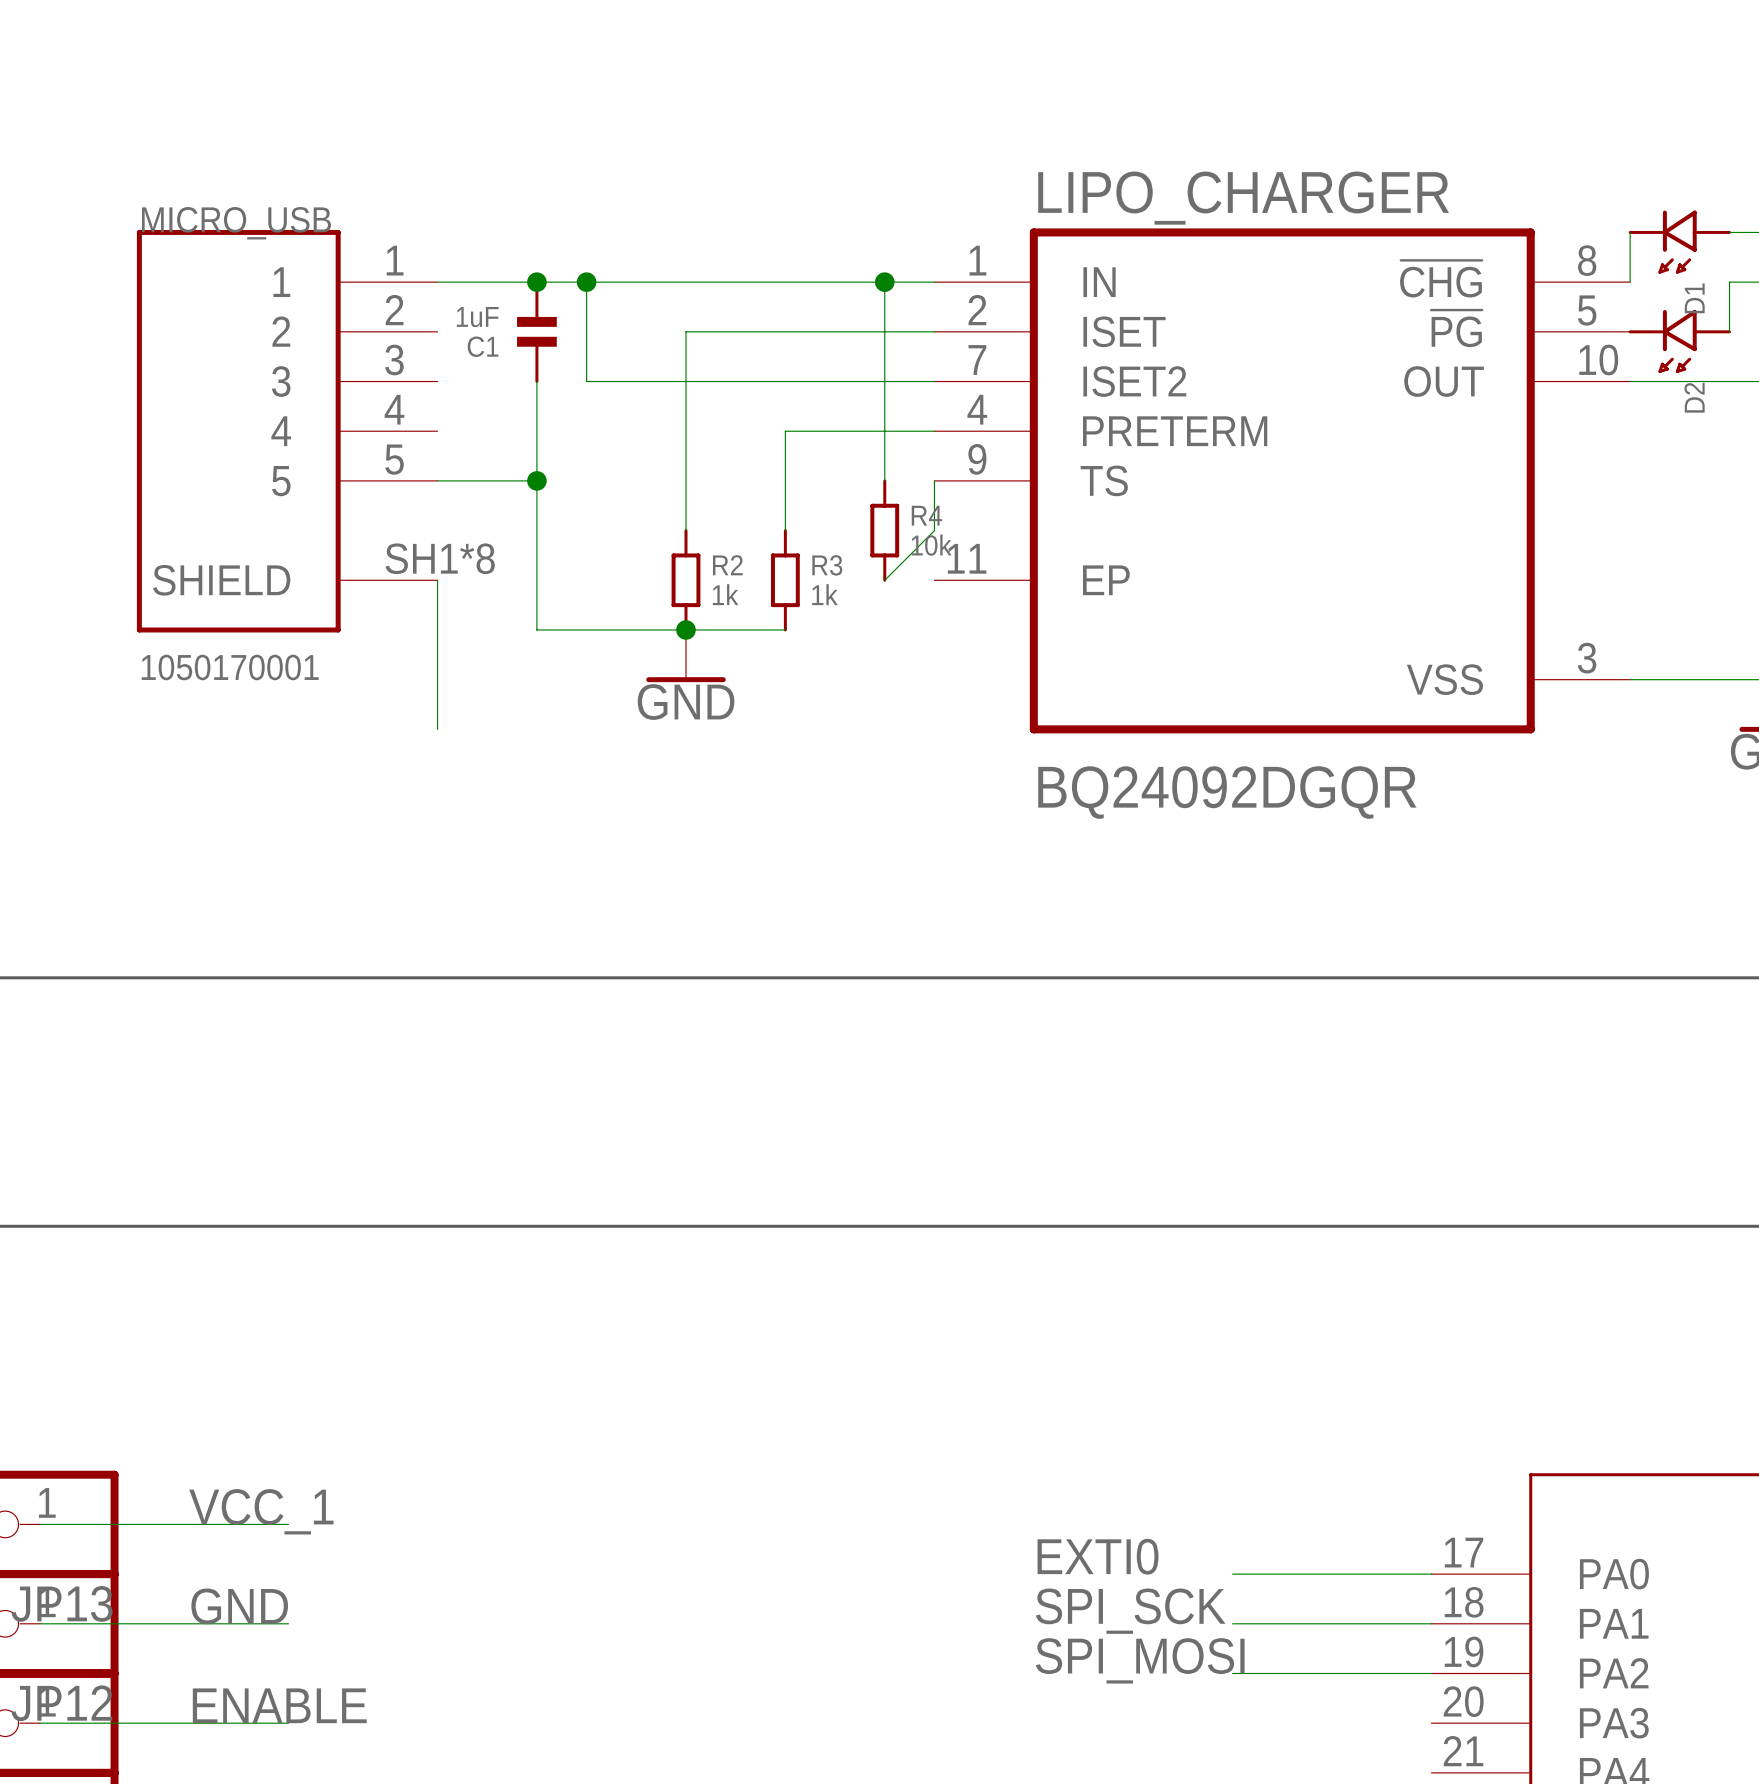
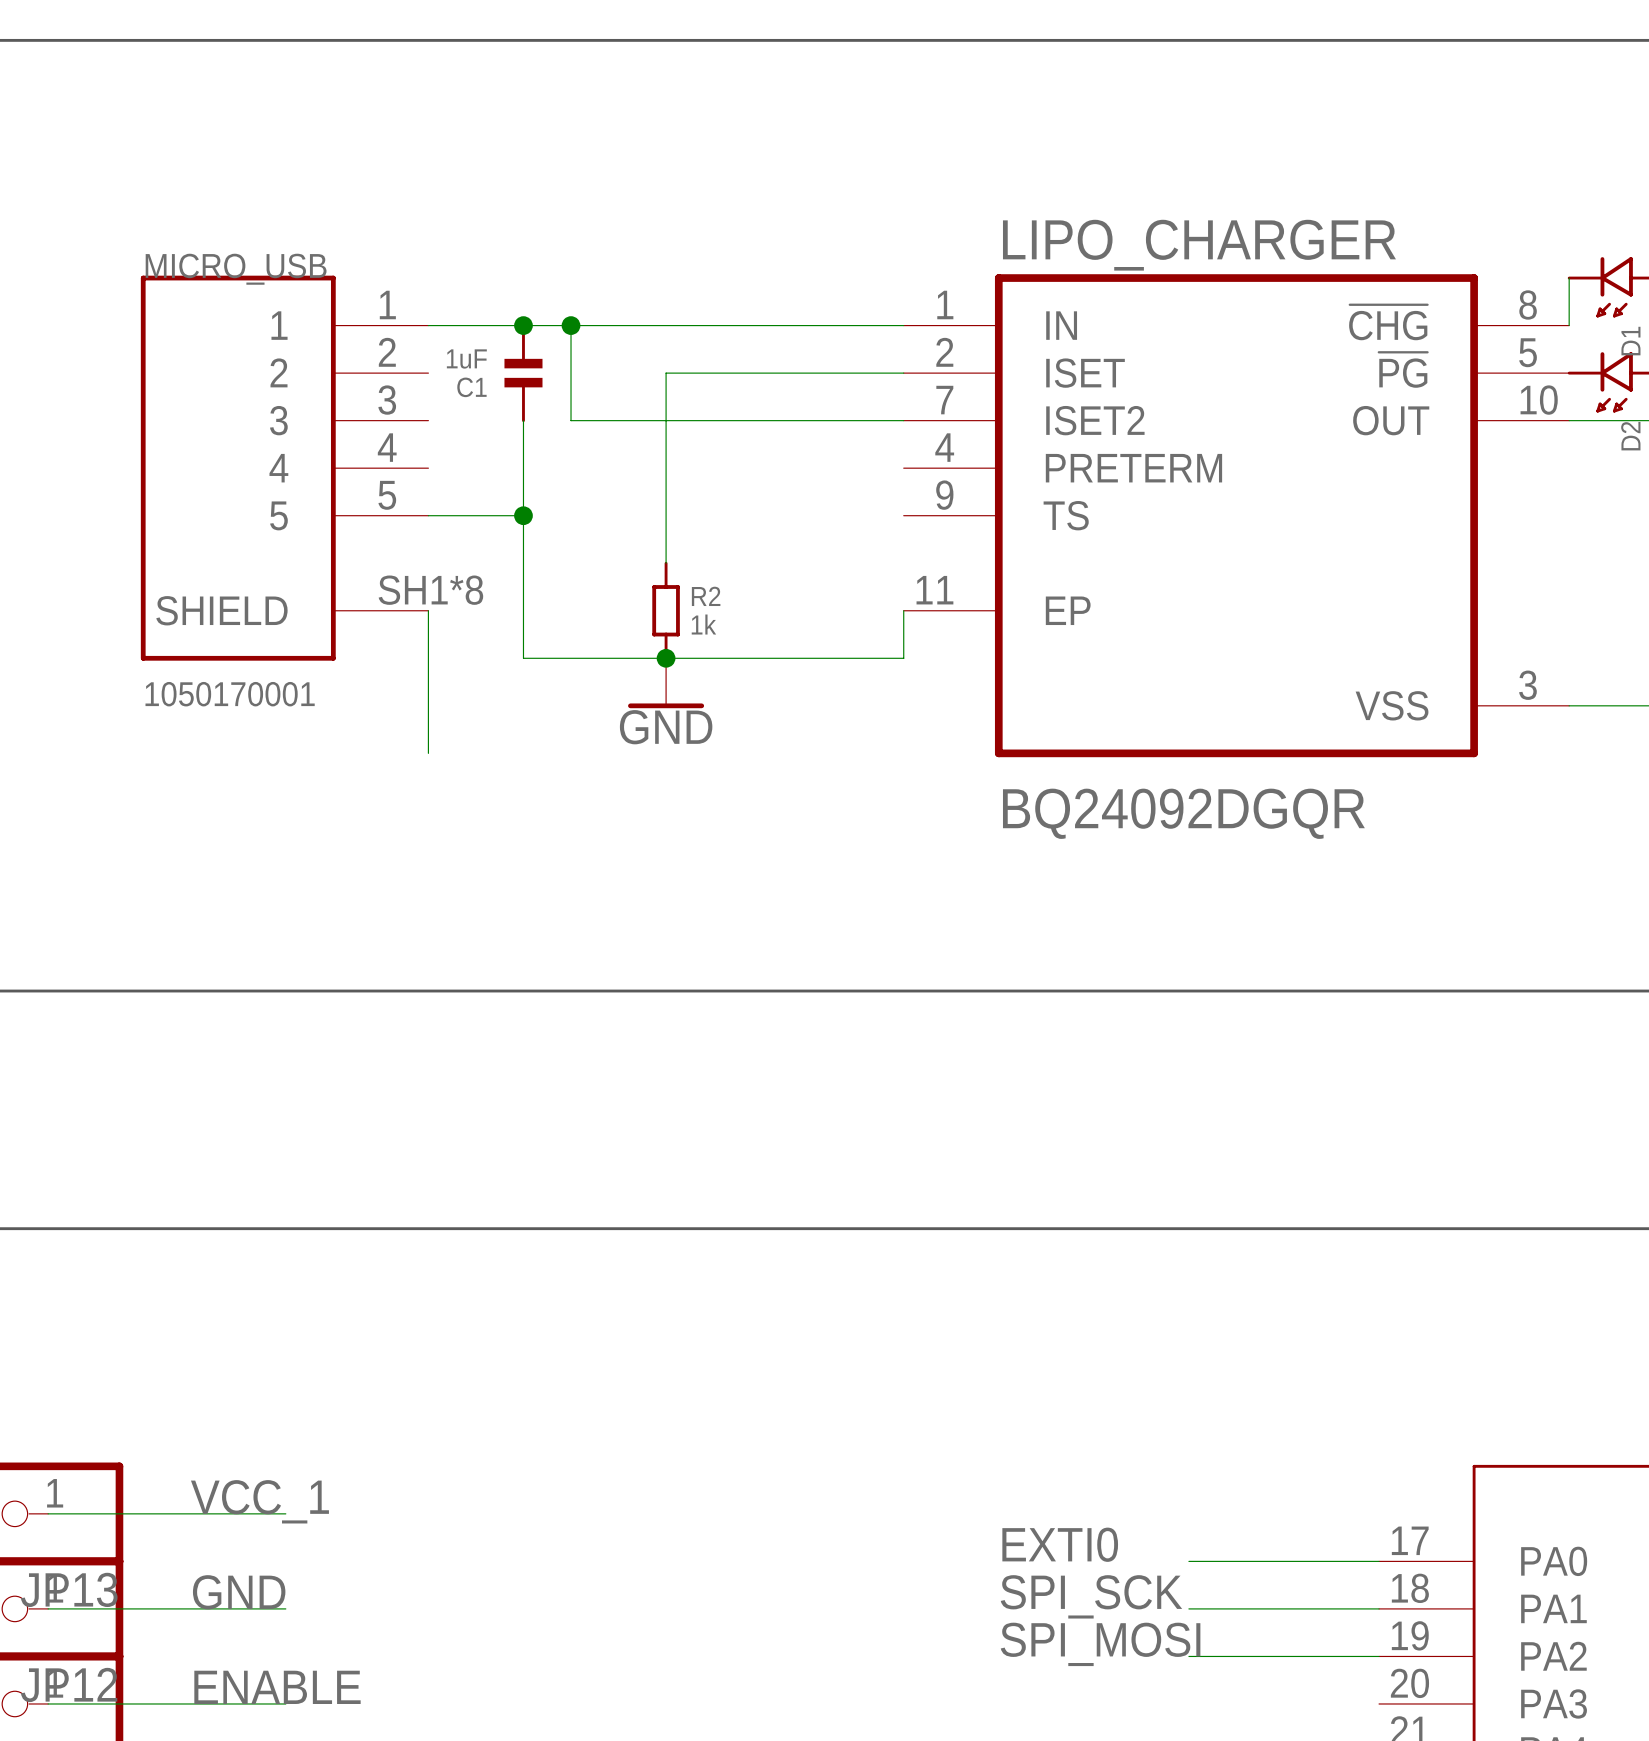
wire: (884, 282) (884, 480) -> none
junction: (884, 282) -> none
wire: (934, 431) (785, 431) (785, 530) -> none
wire: (934, 480) (934, 530) (884, 580) -> none
R4: 10k (884, 530) -> none
R3: 1k (785, 580) -> none
wire: none -> (903, 610) (903, 658) (761, 658)

